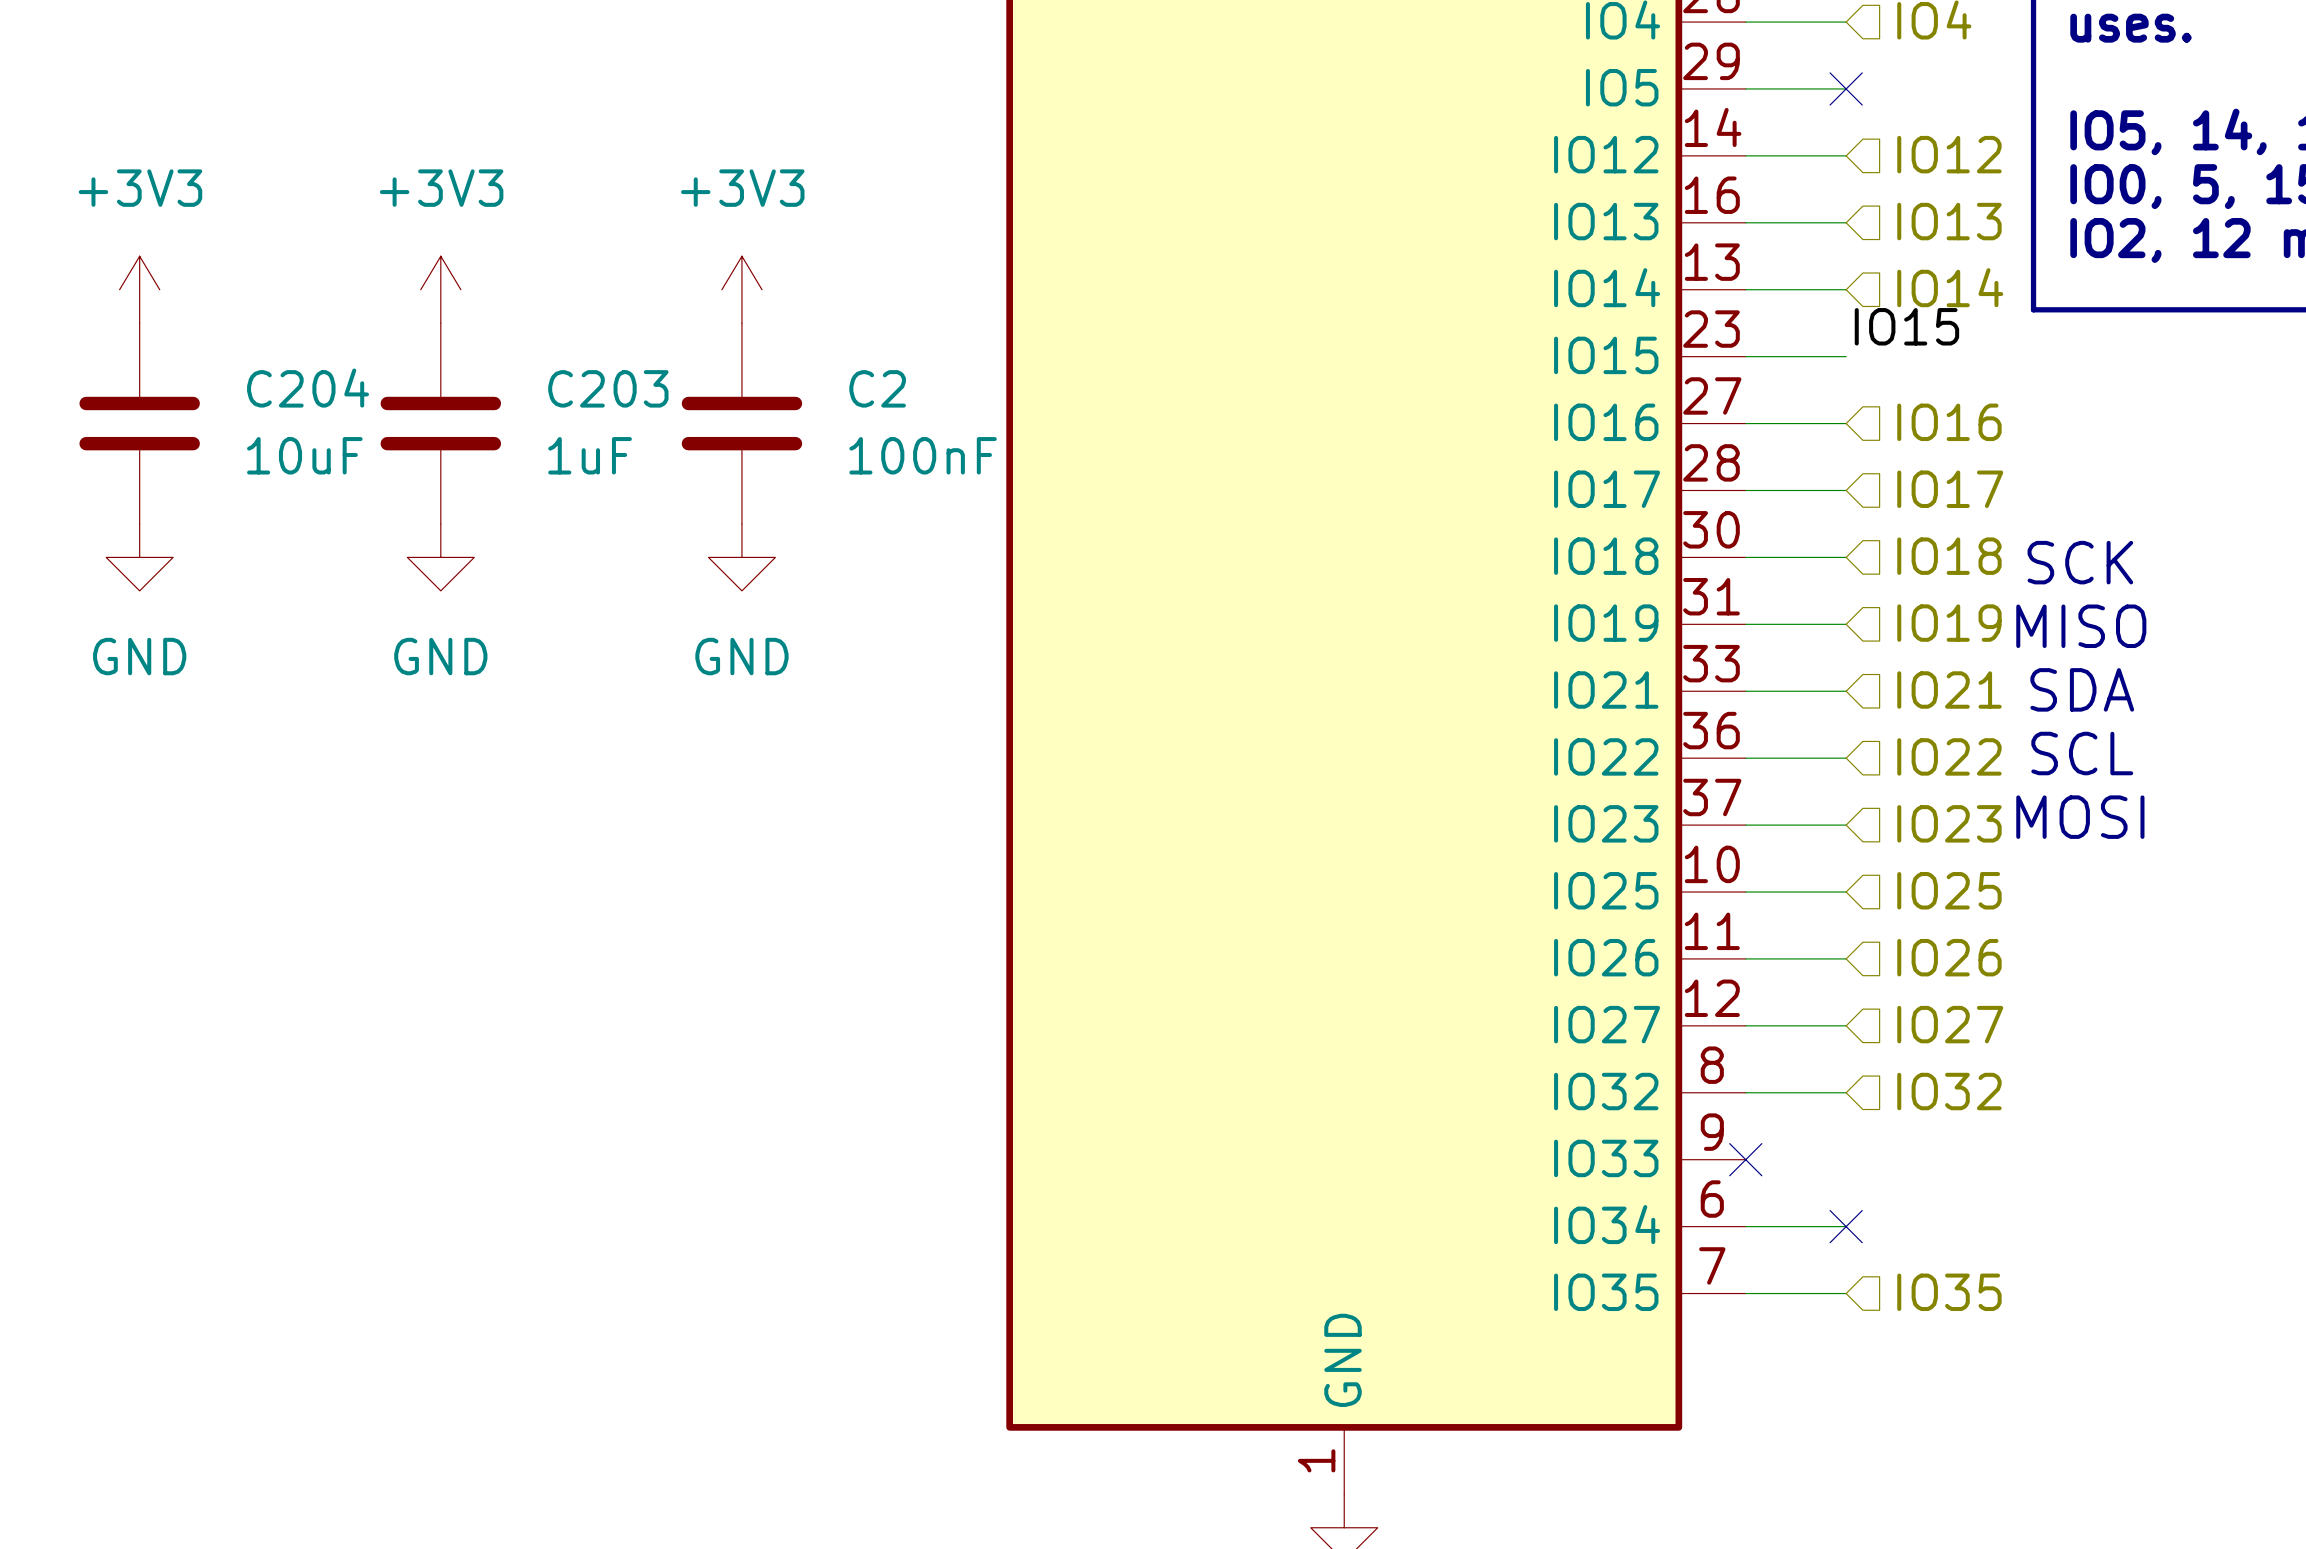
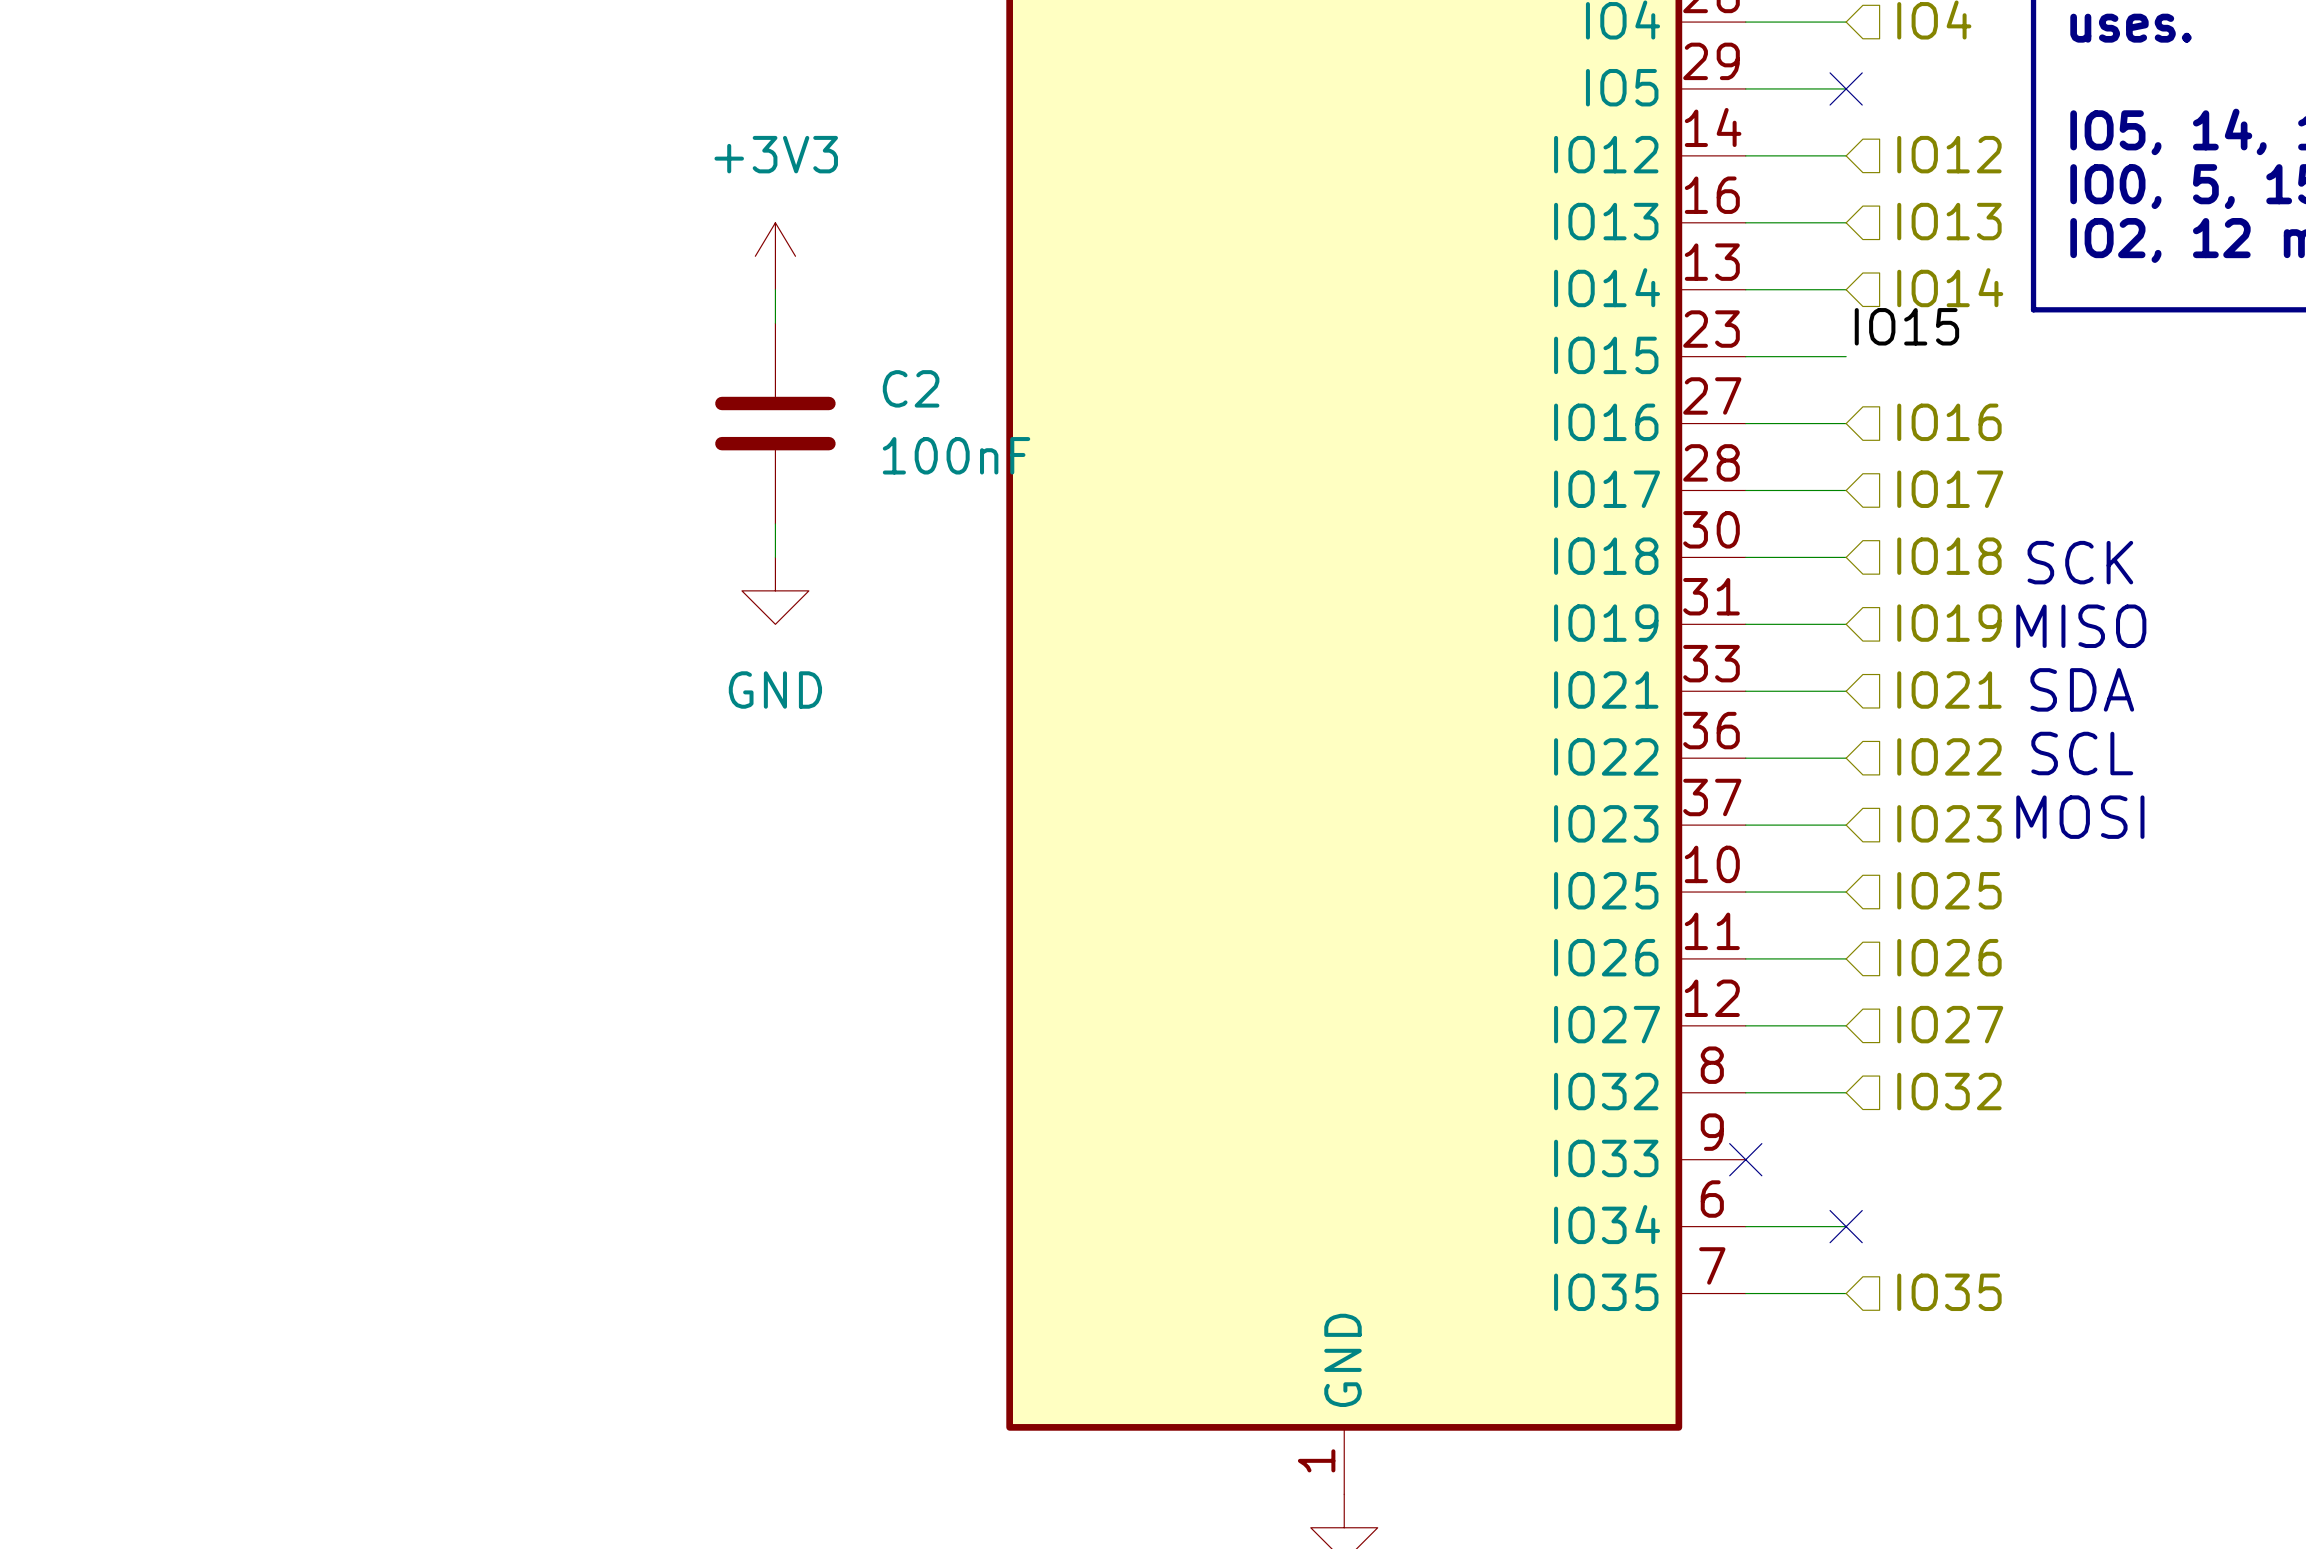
power symbol: +3V3 (139, 289) -> none
power symbol: +3V3 (440, 289) -> none
power symbol position: +3V3 (741, 289) -> +3V3 (775, 256)
wire: none -> (775, 289) (775, 323)
C204: 10uF (139, 423) -> none
C203: 1uF (440, 423) -> none
C2 position: (741, 423) -> (775, 423)
wire: none -> (775, 523) (775, 557)
power symbol: GND (139, 557) -> none
power symbol: GND (440, 557) -> none
power symbol position: GND (741, 557) -> GND (775, 590)

